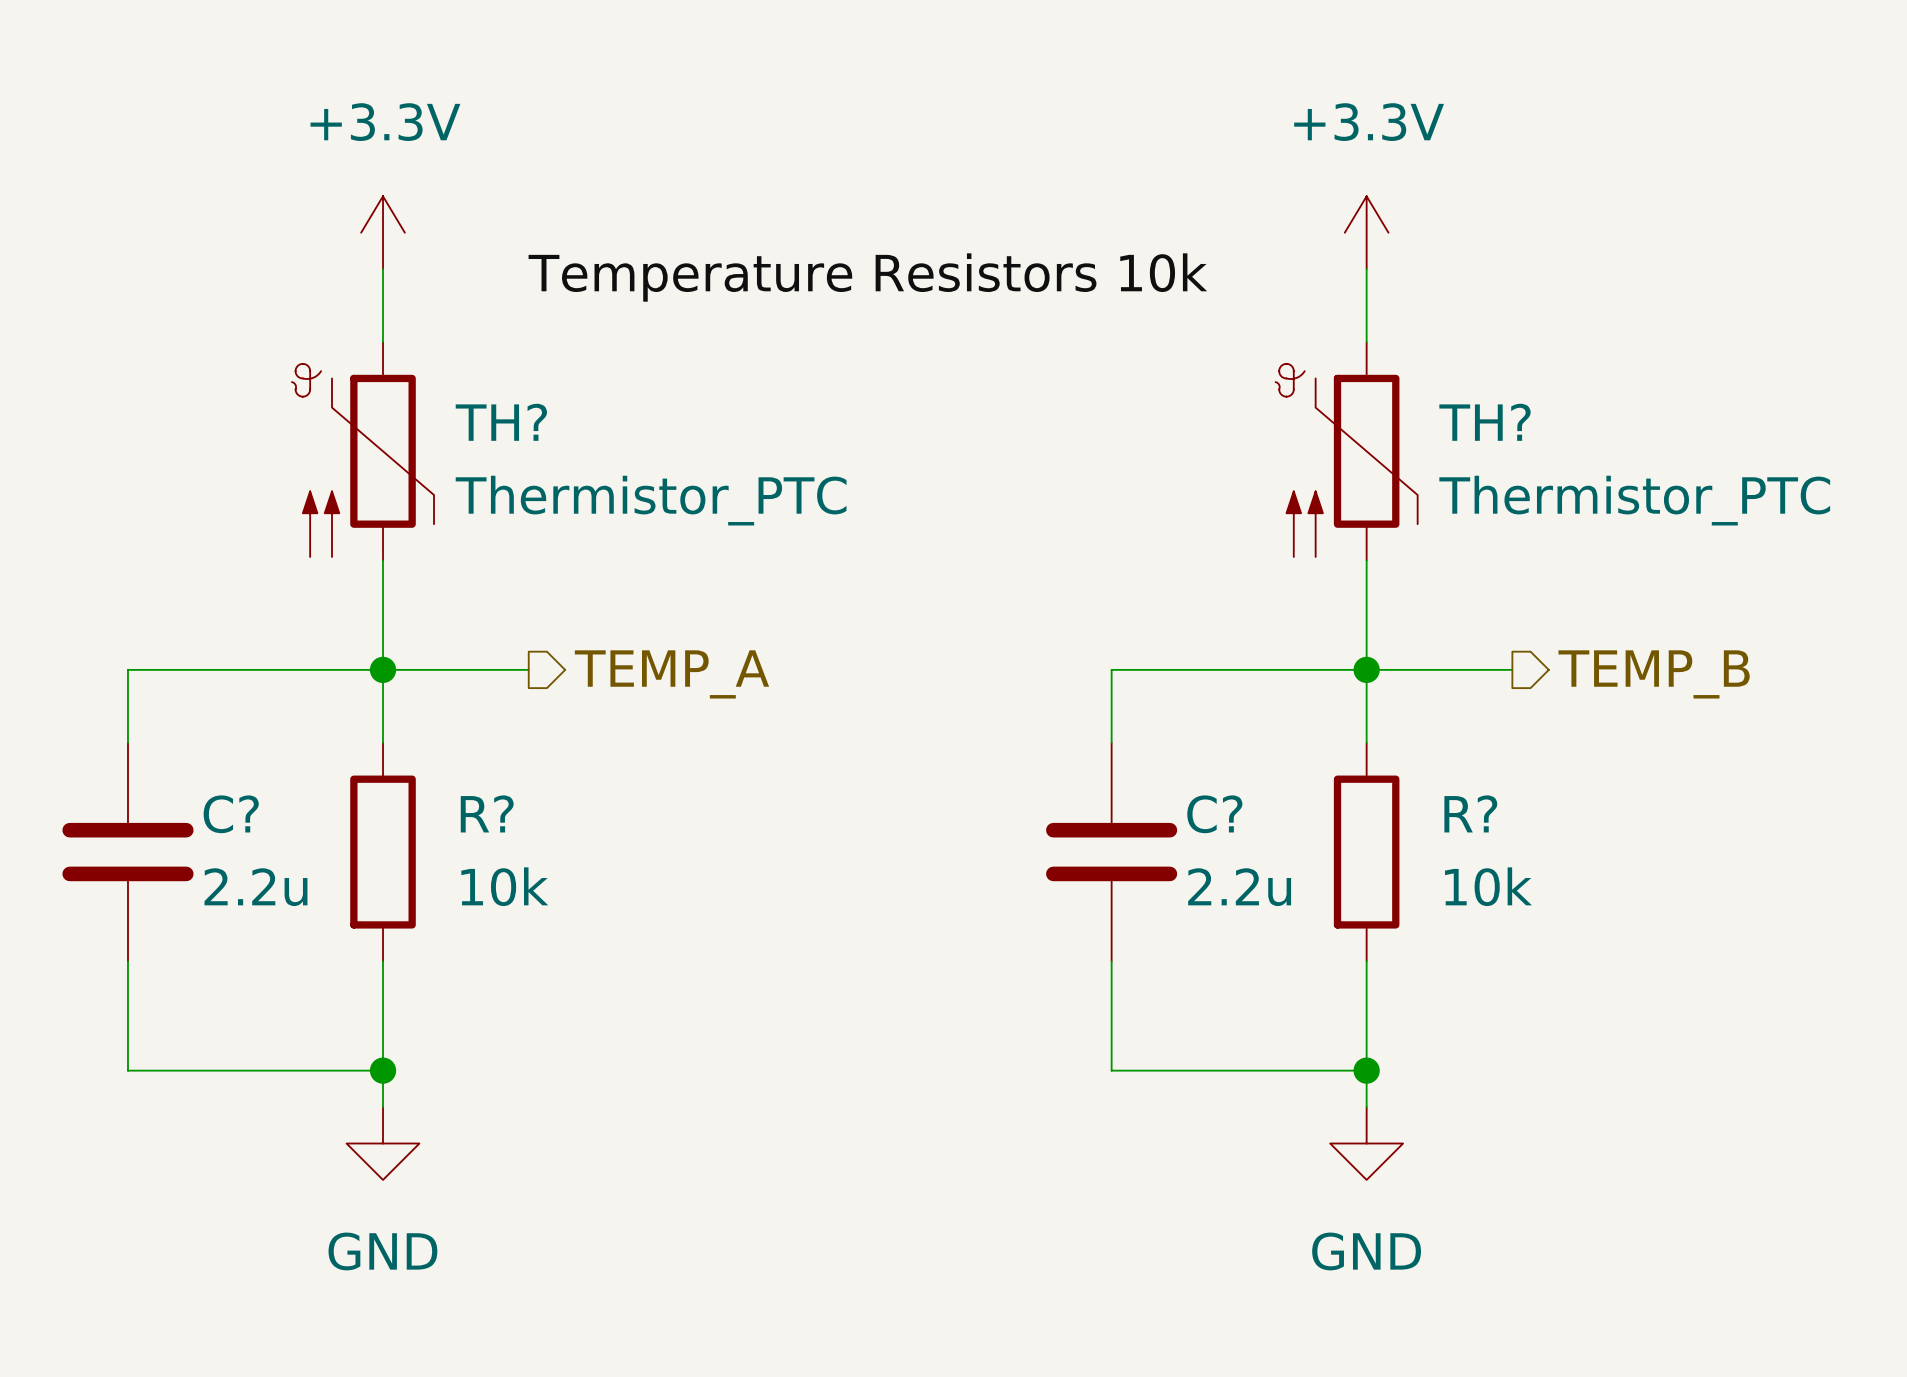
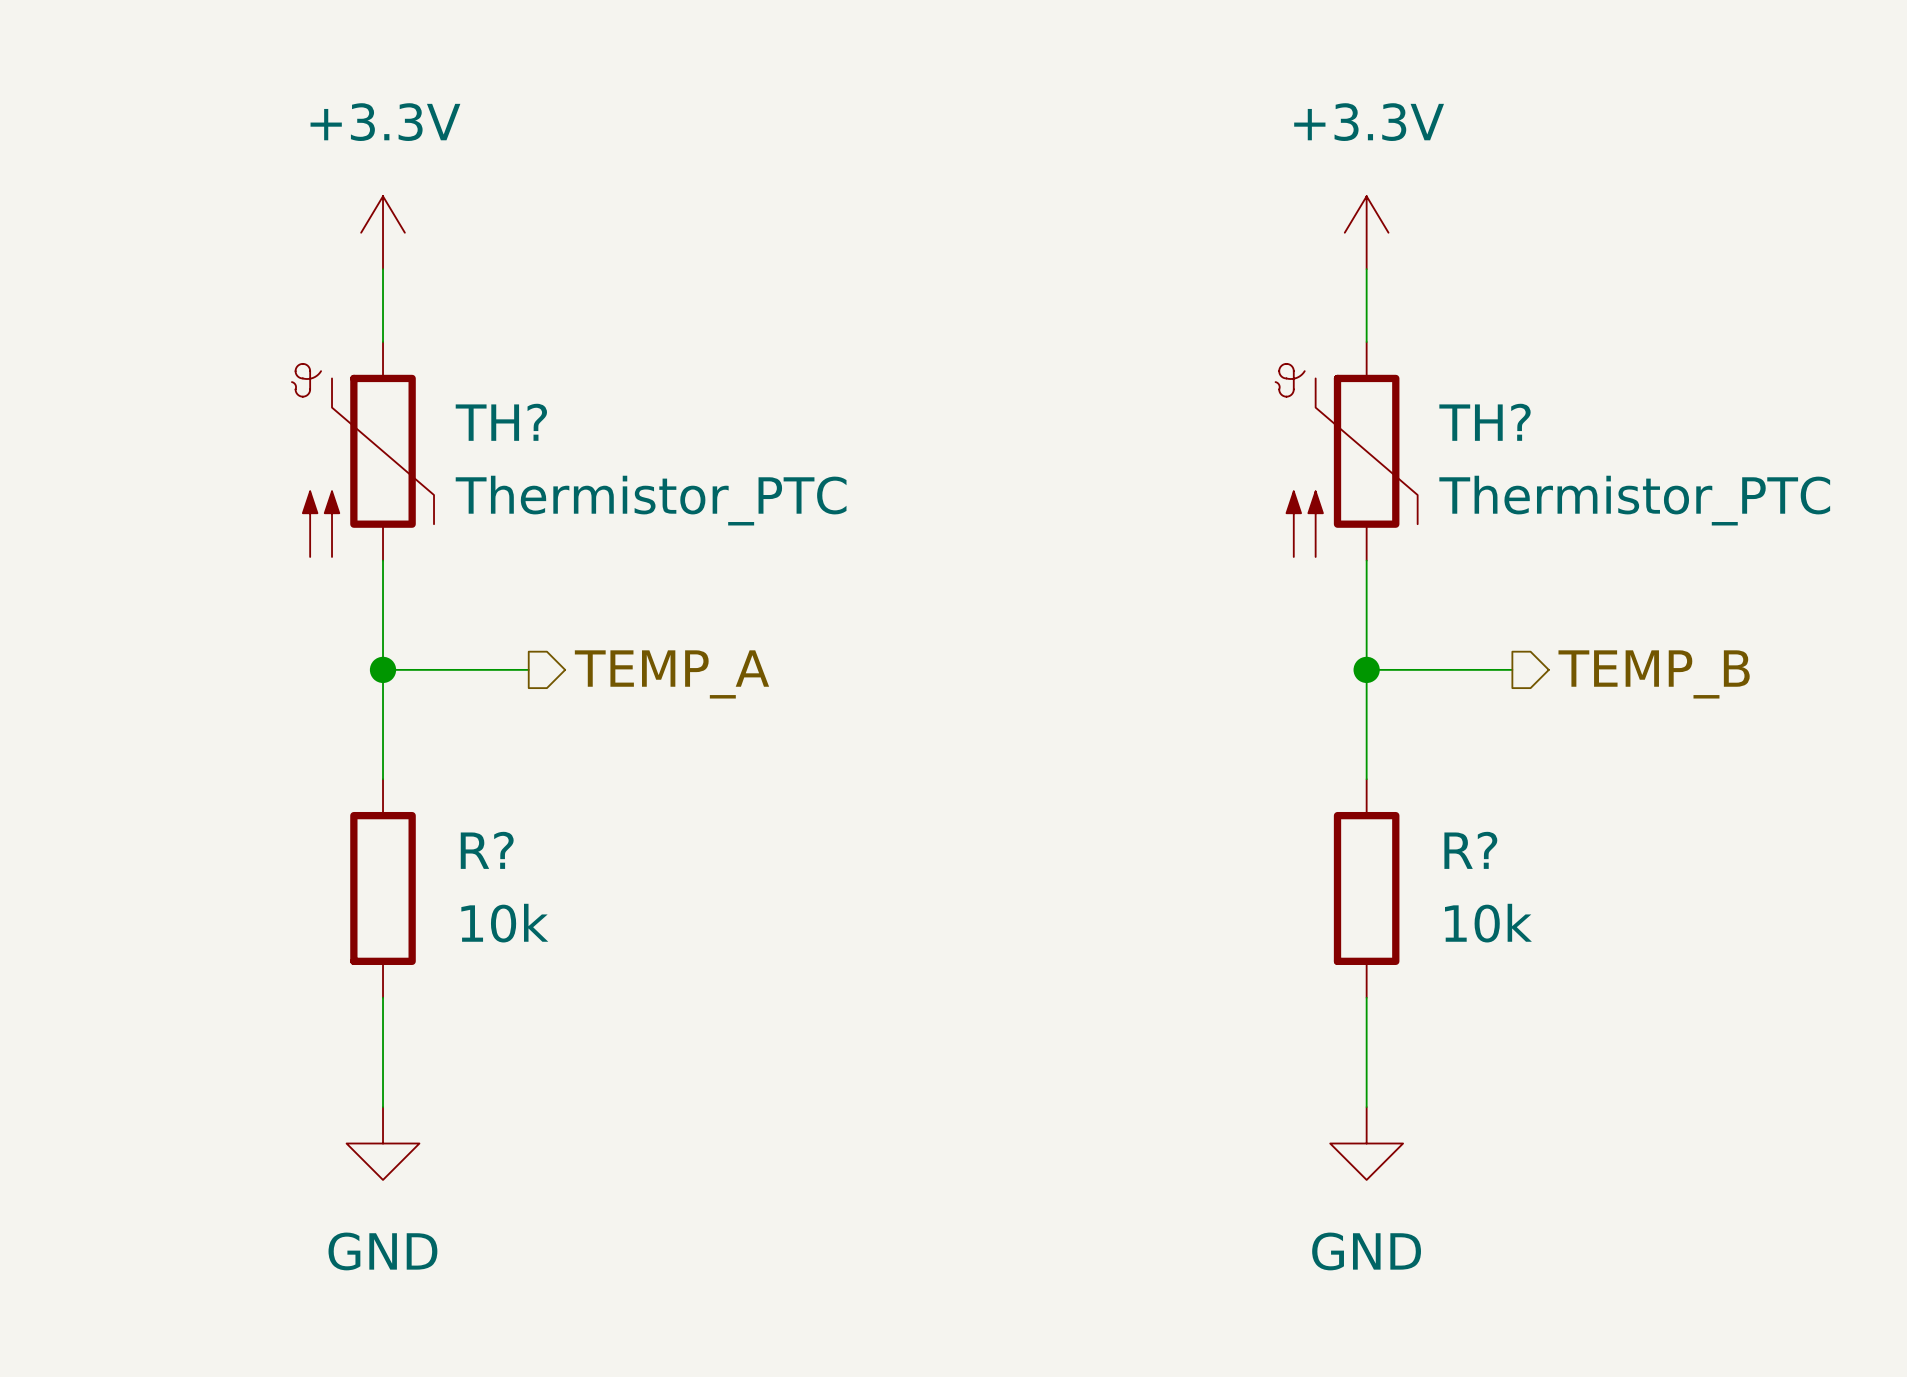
label: Temperature Resistors 10k (867, 277) -> none
wire: (383, 669) (127, 669) (127, 742) -> none
wire: (1366, 669) (1111, 669) (1111, 742) -> none
C?: 2.2u (127, 852) -> none
R? position: (383, 852) -> (383, 888)
C?: 2.2u (1111, 852) -> none
R? position: (1366, 852) -> (1366, 888)
wire: (127, 961) (127, 1070) (383, 1070) -> none
wire: (1111, 961) (1111, 1070) (1366, 1070) -> none
junction: (383, 1070) -> none
junction: (1366, 1070) -> none

